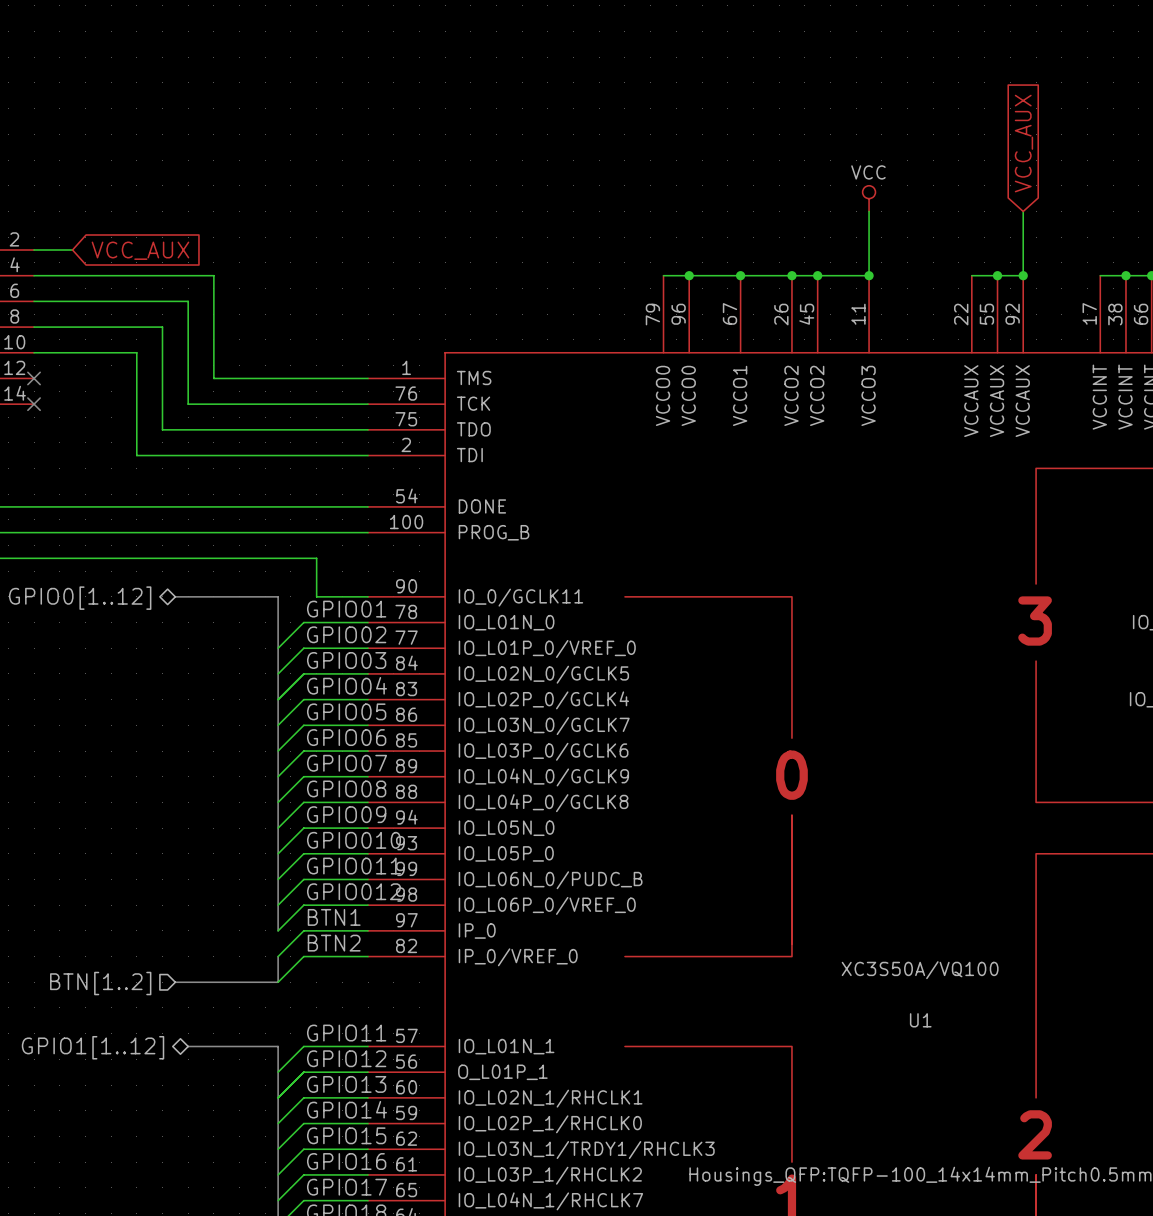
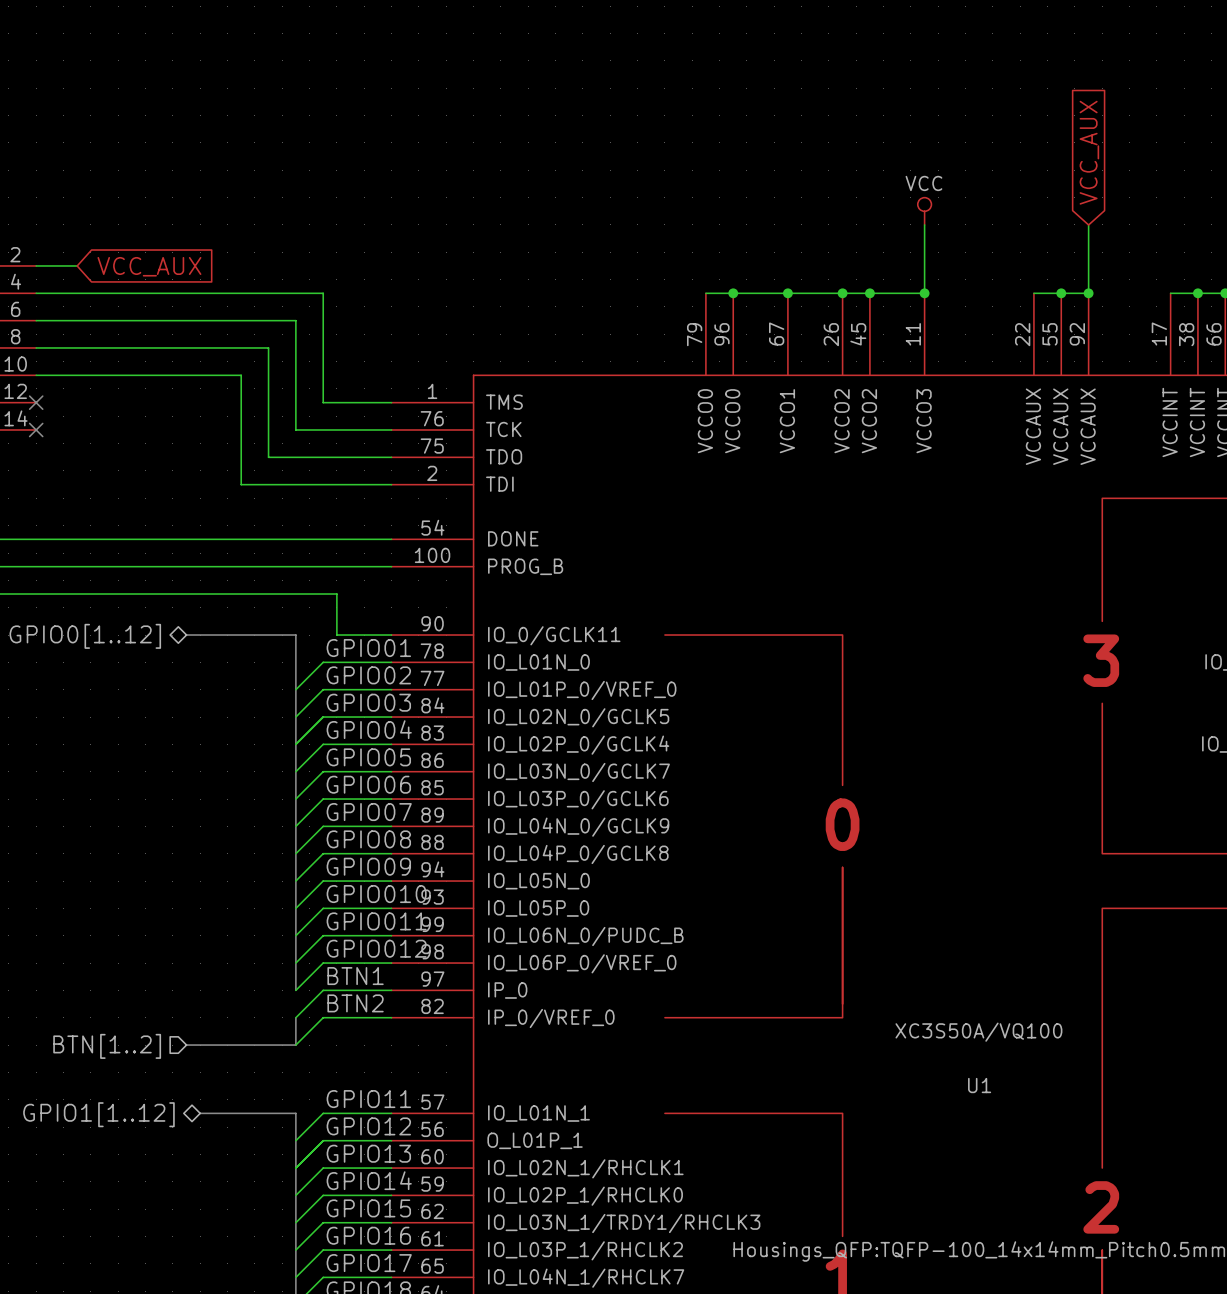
wire: (213, 275) (213, 378) (303, 378) -> (227, 293) (323, 293) (323, 402)
wire: (188, 301) (188, 404) (278, 404) -> (200, 320) (295, 320) (295, 429)
wire: (162, 327) (162, 429) (252, 429) -> (172, 347) (268, 347) (268, 457)
wire: (136, 352) (136, 455) (226, 455) -> (145, 375) (241, 375) (241, 484)

